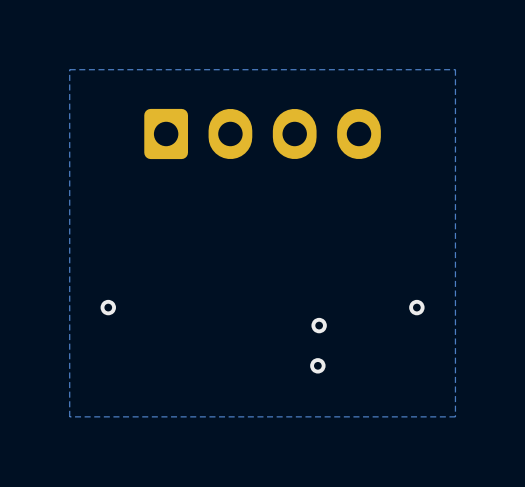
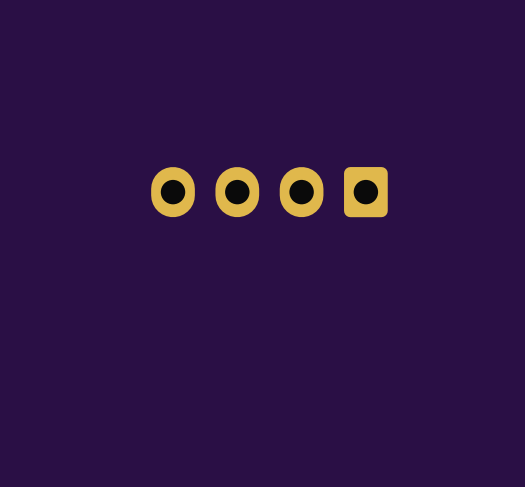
zone outline: (455, 69) (455, 416) (69, 416) (69, 69) (455, 69) -> none
part rotation: 0° (262, 133) -> 180° (269, 192)
via: (108, 307) -> none
via: (416, 307) -> none
via: (319, 325) -> none
via: (317, 365) -> none

